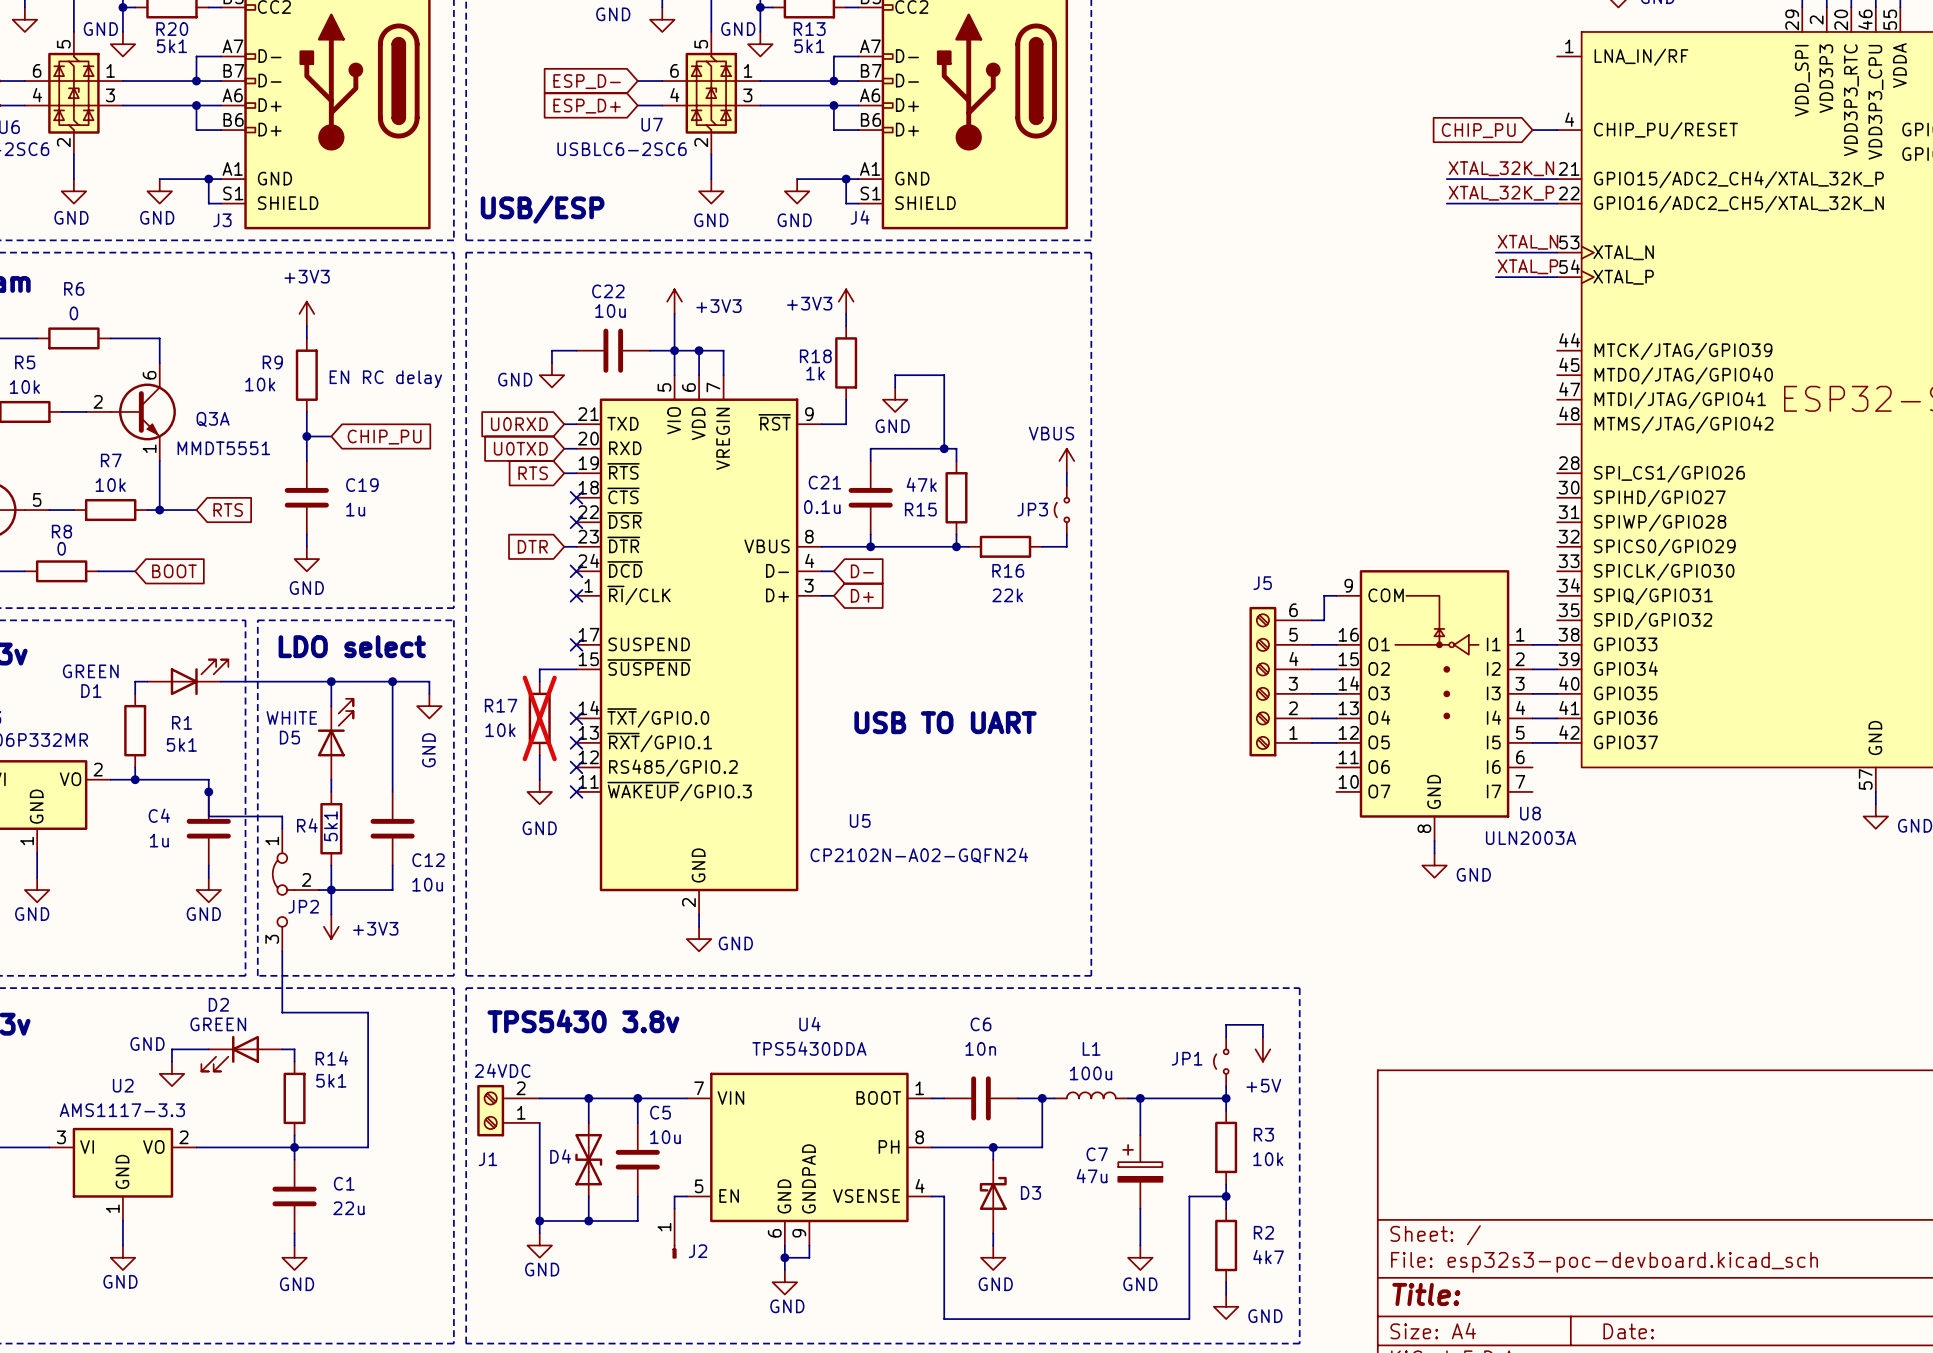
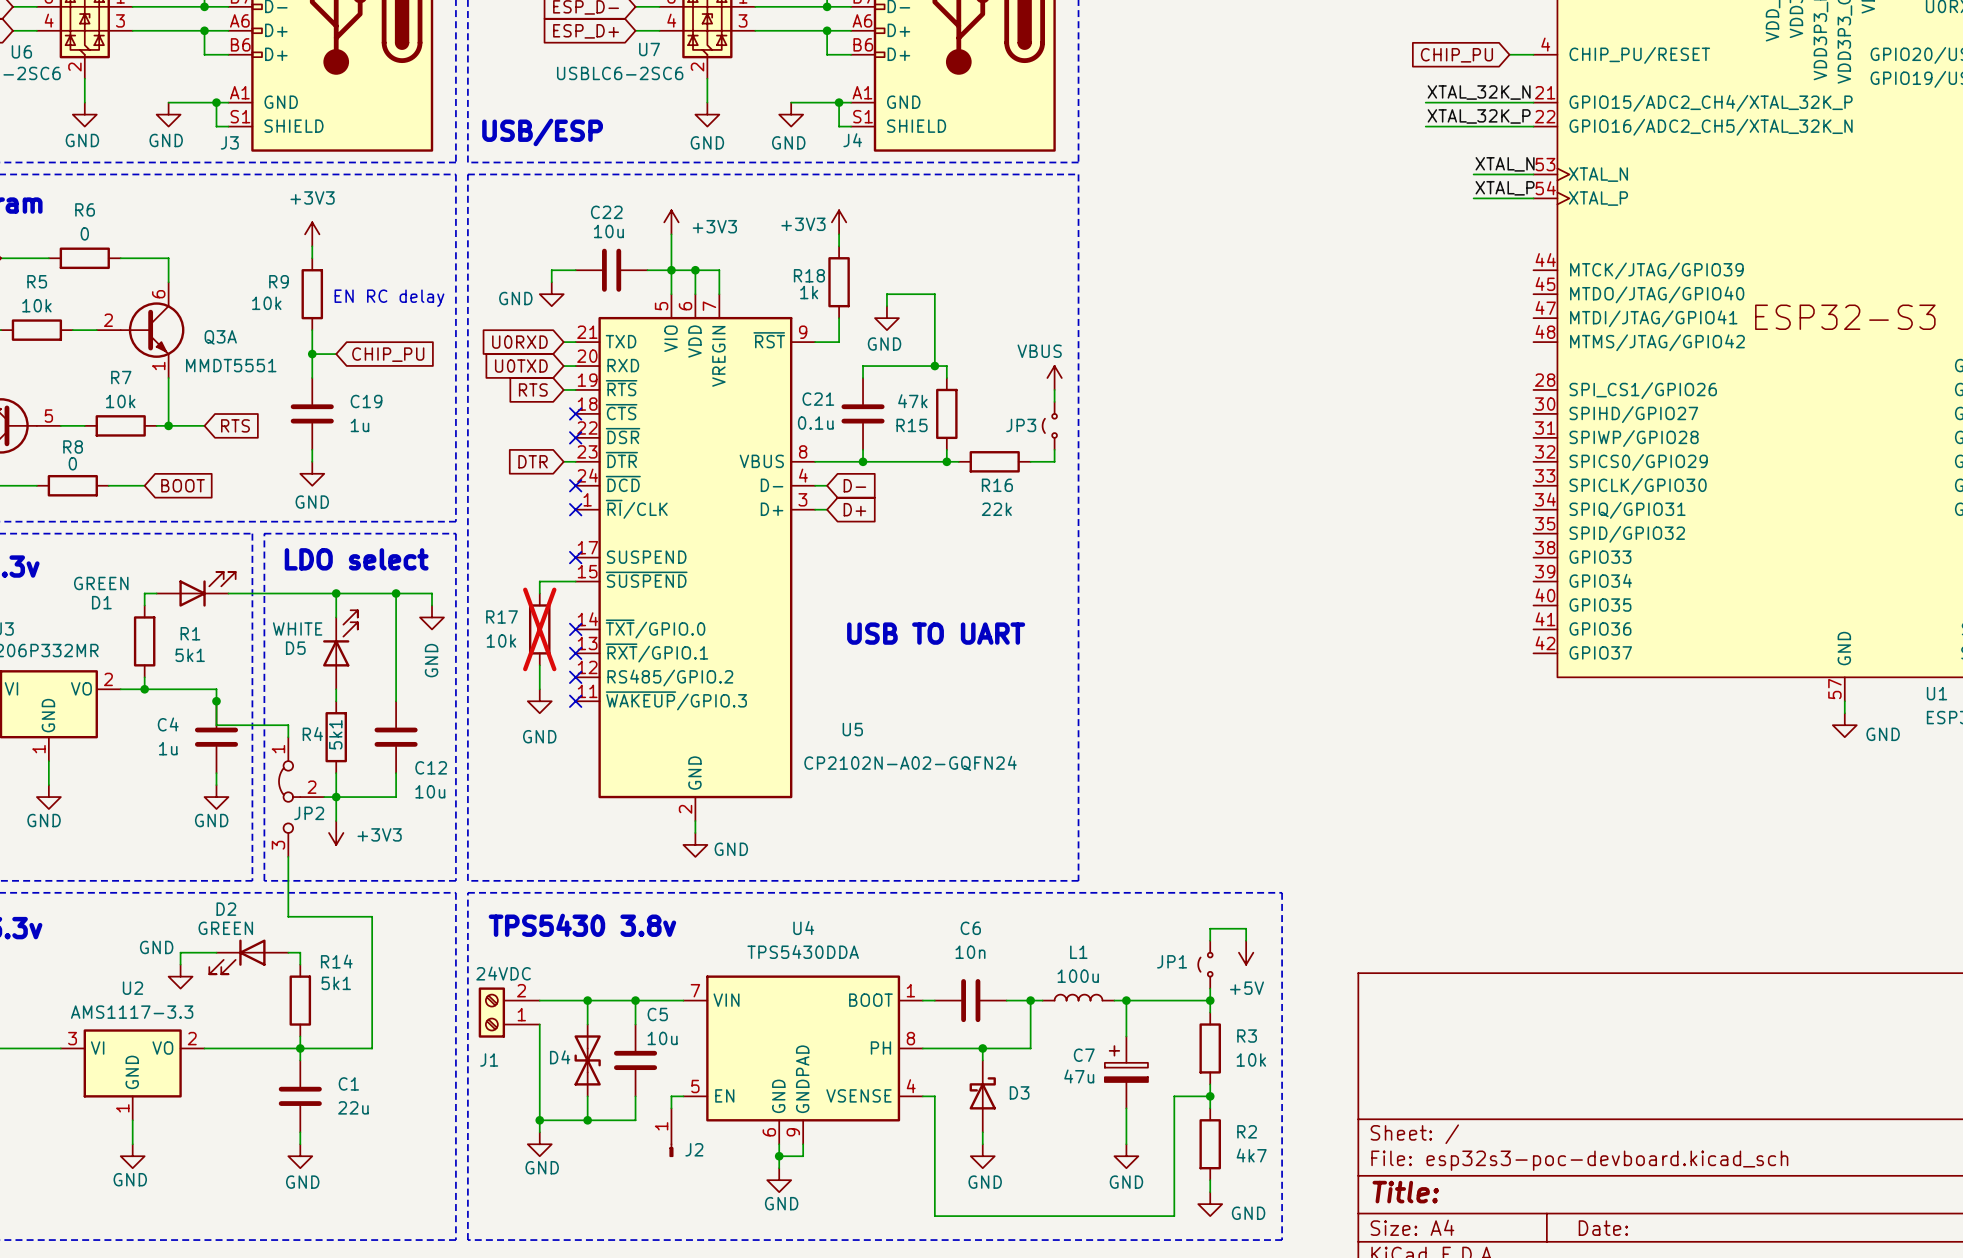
wire: (1336, 595) (1324, 595) (1324, 620) (1311, 620) -> none
wire: (1311, 644) (1336, 644) -> none
wire: (1532, 644) (1557, 644) -> none
wire: (1311, 669) (1336, 669) -> none
wire: (1532, 669) (1557, 669) -> none
J5: (1280, 681) -> none
wire: (1311, 693) (1336, 693) -> none
wire: (1532, 693) (1557, 693) -> none
U8: ULN2003A (1434, 705) -> none
wire: (1311, 718) (1336, 718) -> none
wire: (1532, 718) (1557, 718) -> none
wire: (1311, 742) (1336, 742) -> none
wire: (1532, 742) (1557, 742) -> none
wire: (1434, 840) (1434, 853) -> none
power symbol: GND (1434, 865) -> none

